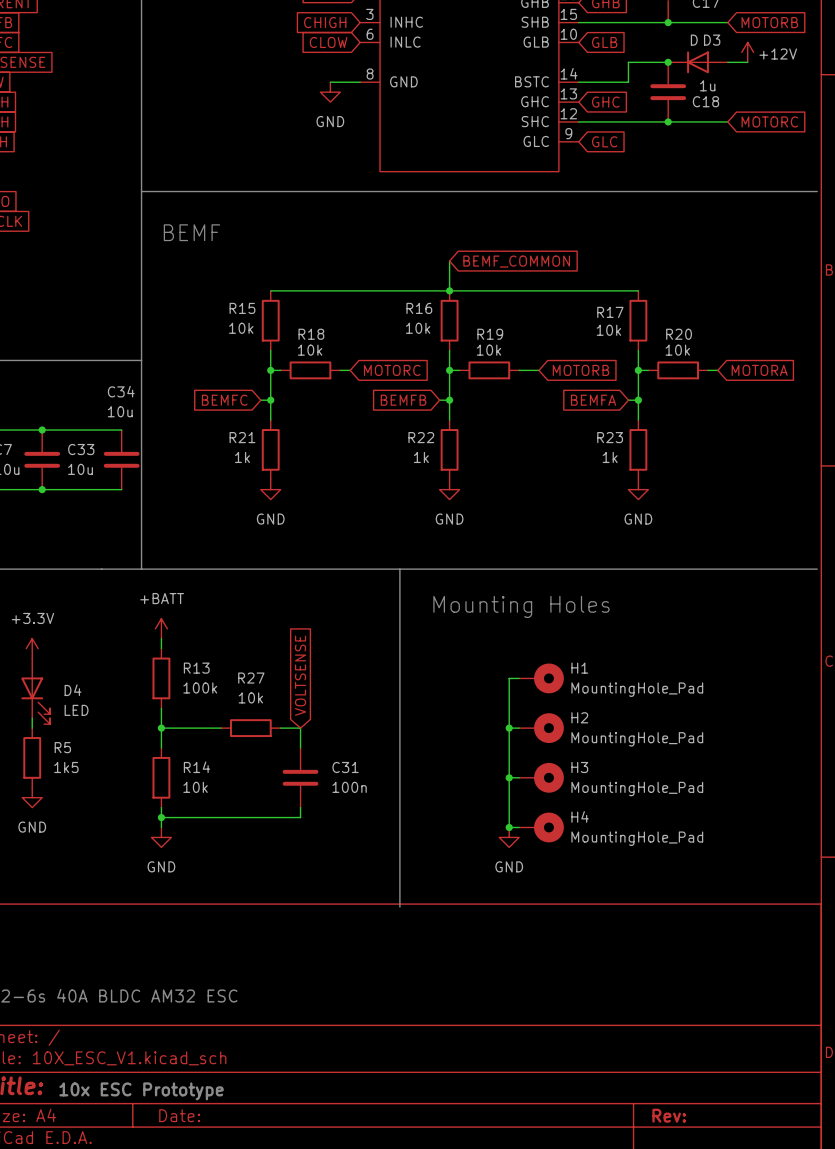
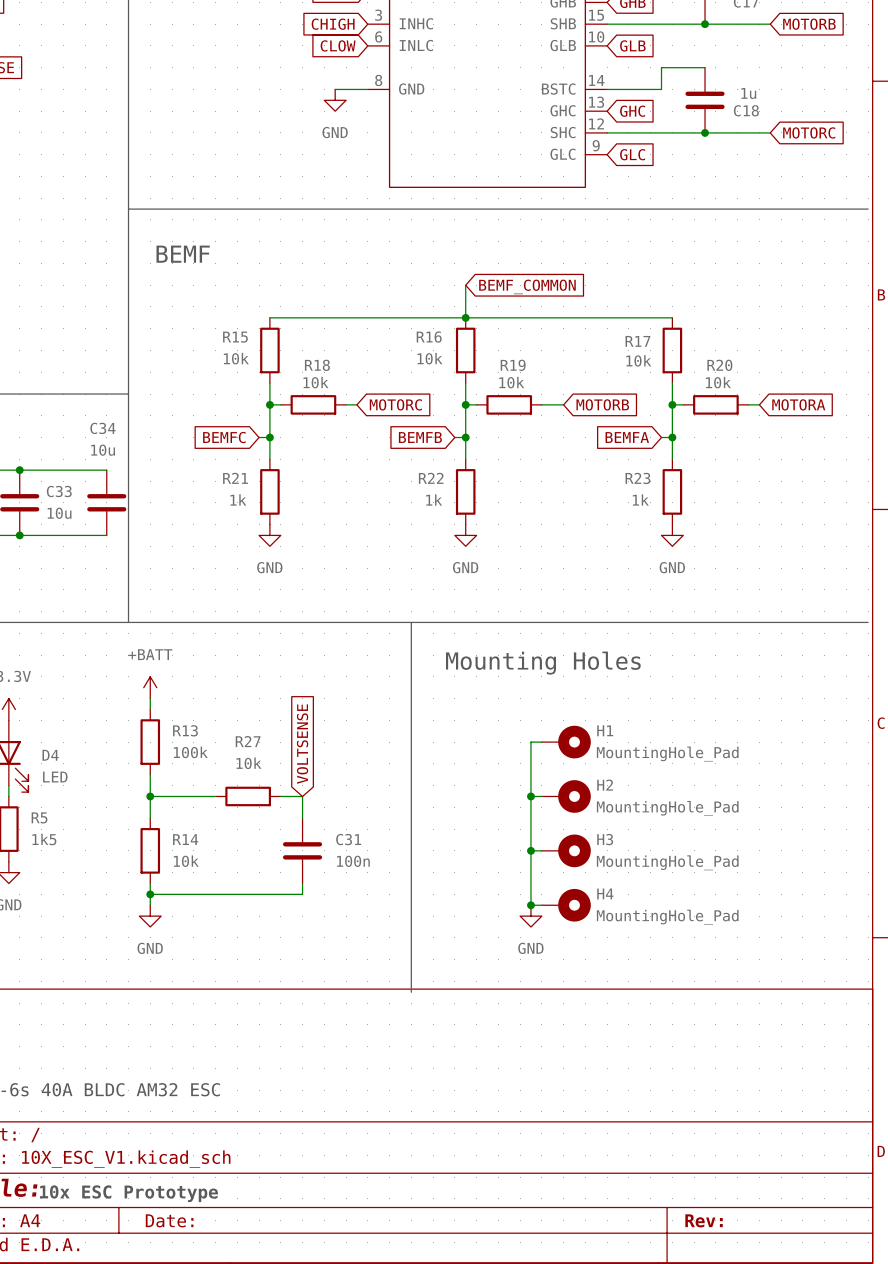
power symbol: +12V (747, 52) -> none
junction: (668, 62) -> none
D3: D (698, 62) -> none
wire: (727, 62) (747, 62) -> none

